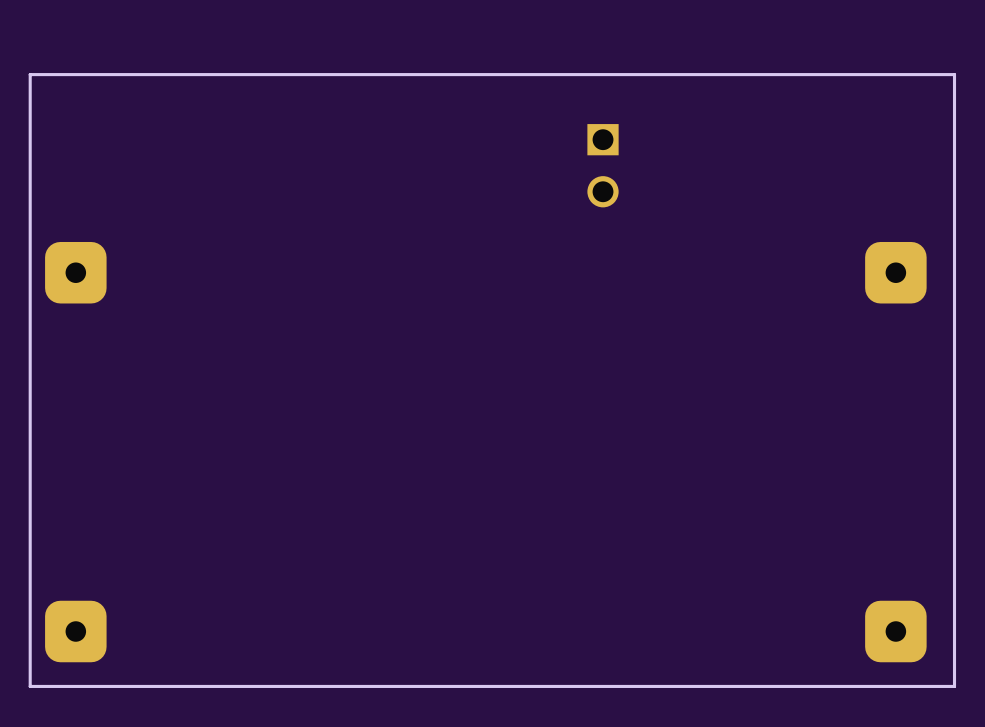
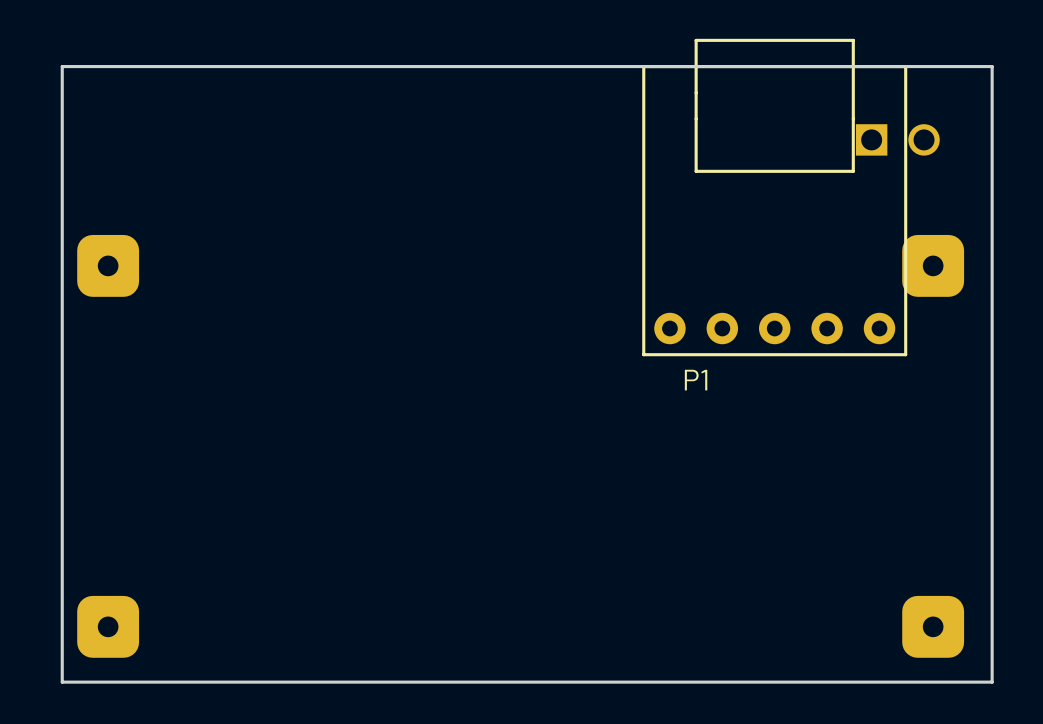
part rotation: 0° (603, 165) -> 90° counterclockwise (897, 139)
part position: (603, 165) -> (897, 139)
P1: none -> (774, 197)

